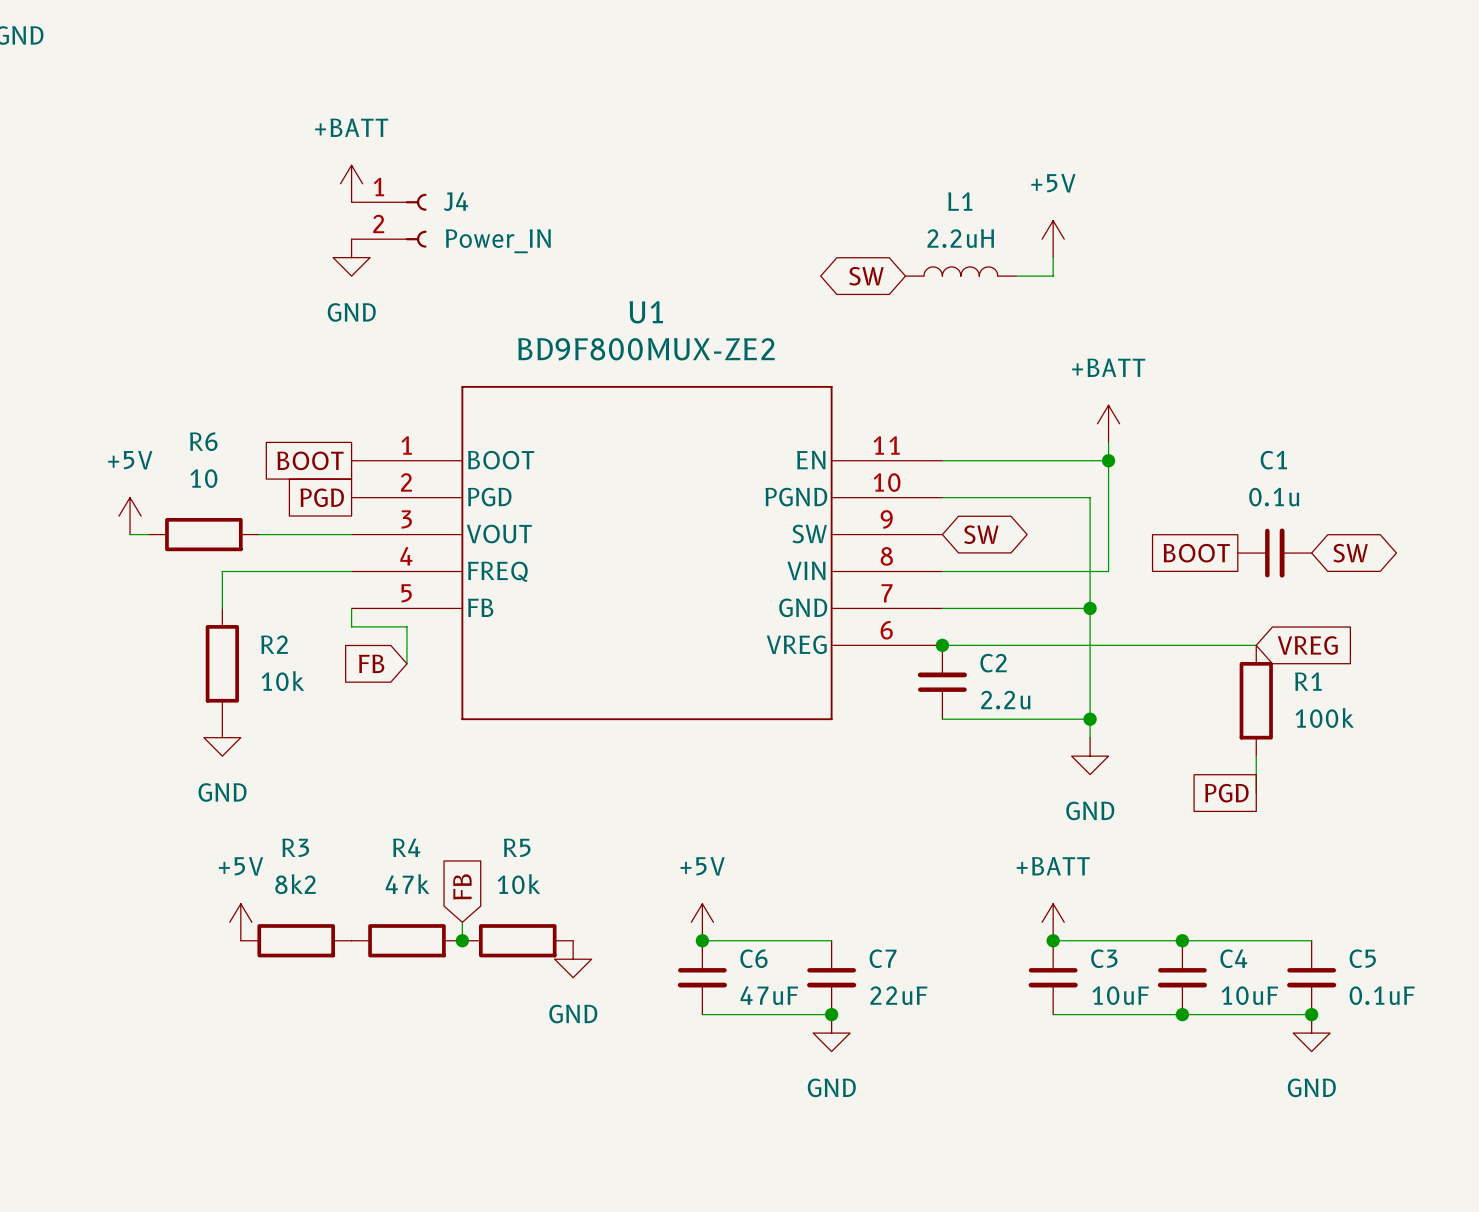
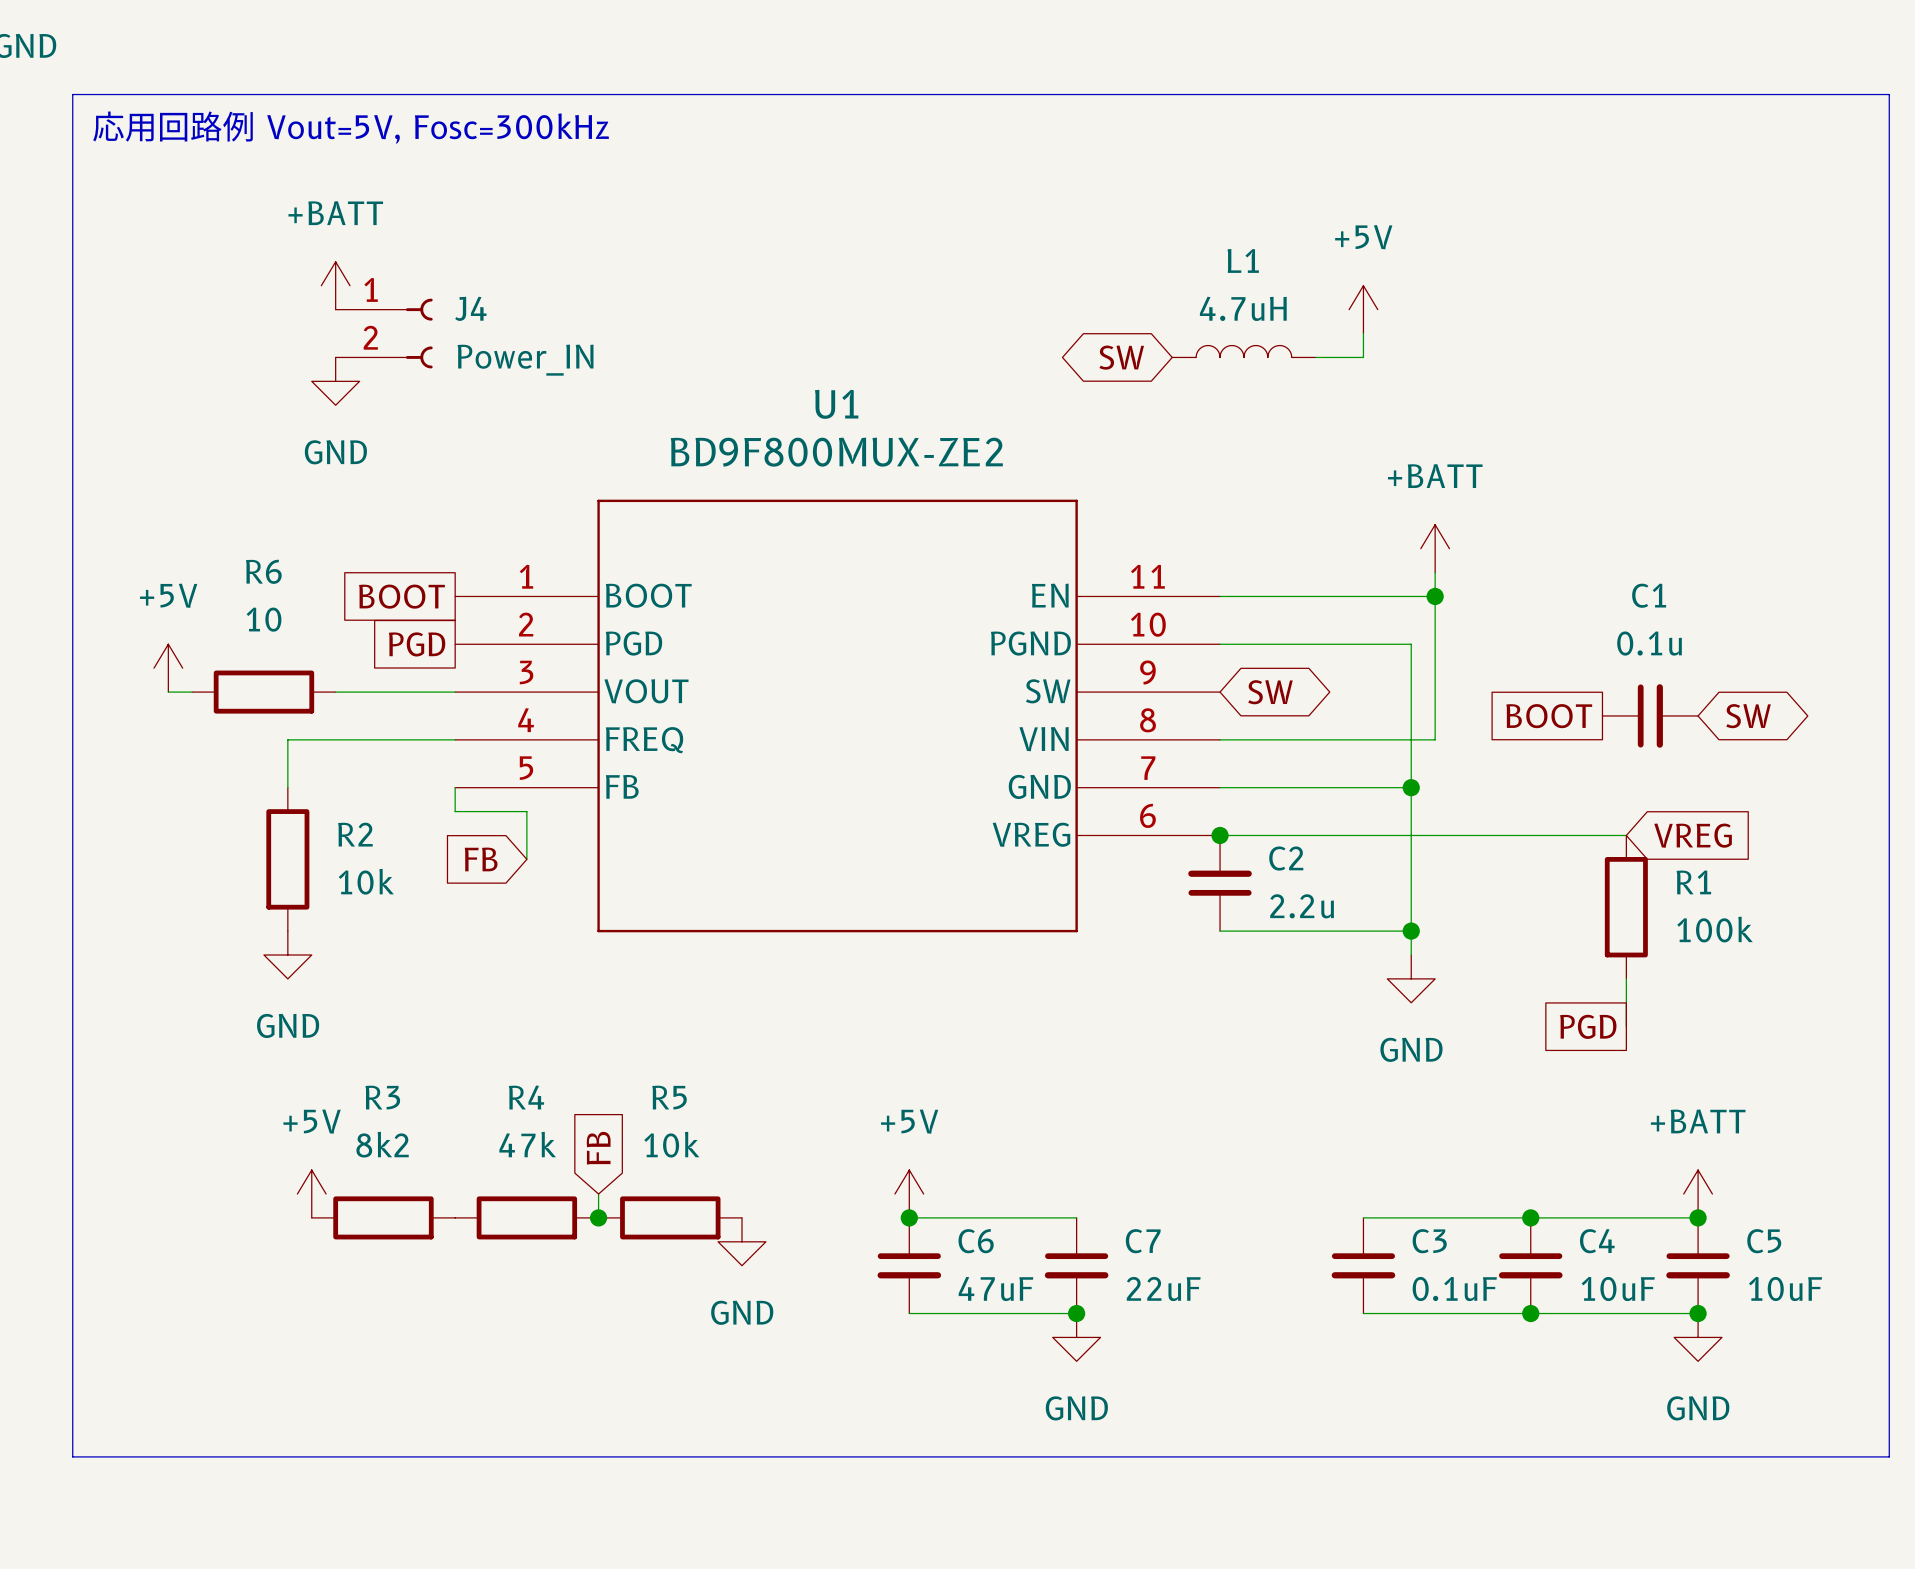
line: none -> (72, 94) (1889, 94) (1889, 1456) (72, 1456) (72, 94)
text: none -> 応用回路例 Vout=5V, Fosc=300kHz (351, 127)
power symbol position: +BATT (351, 183) -> +BATT (335, 285)
J4 position: (389, 220) -> (384, 333)
L1 value: 2.2uH (960, 238) -> 4.7uH (1243, 308)
power symbol position: GND (351, 257) -> GND (335, 381)
power symbol position: +BATT (1053, 922) -> +BATT (1698, 1194)
junction: (1053, 940) -> none
junction: none -> (1698, 1217)
C3 value: 10uF (1120, 995) -> 0.1uF (1454, 1288)
C5 value: 0.1uF (1382, 995) -> 10uF (1785, 1288)

